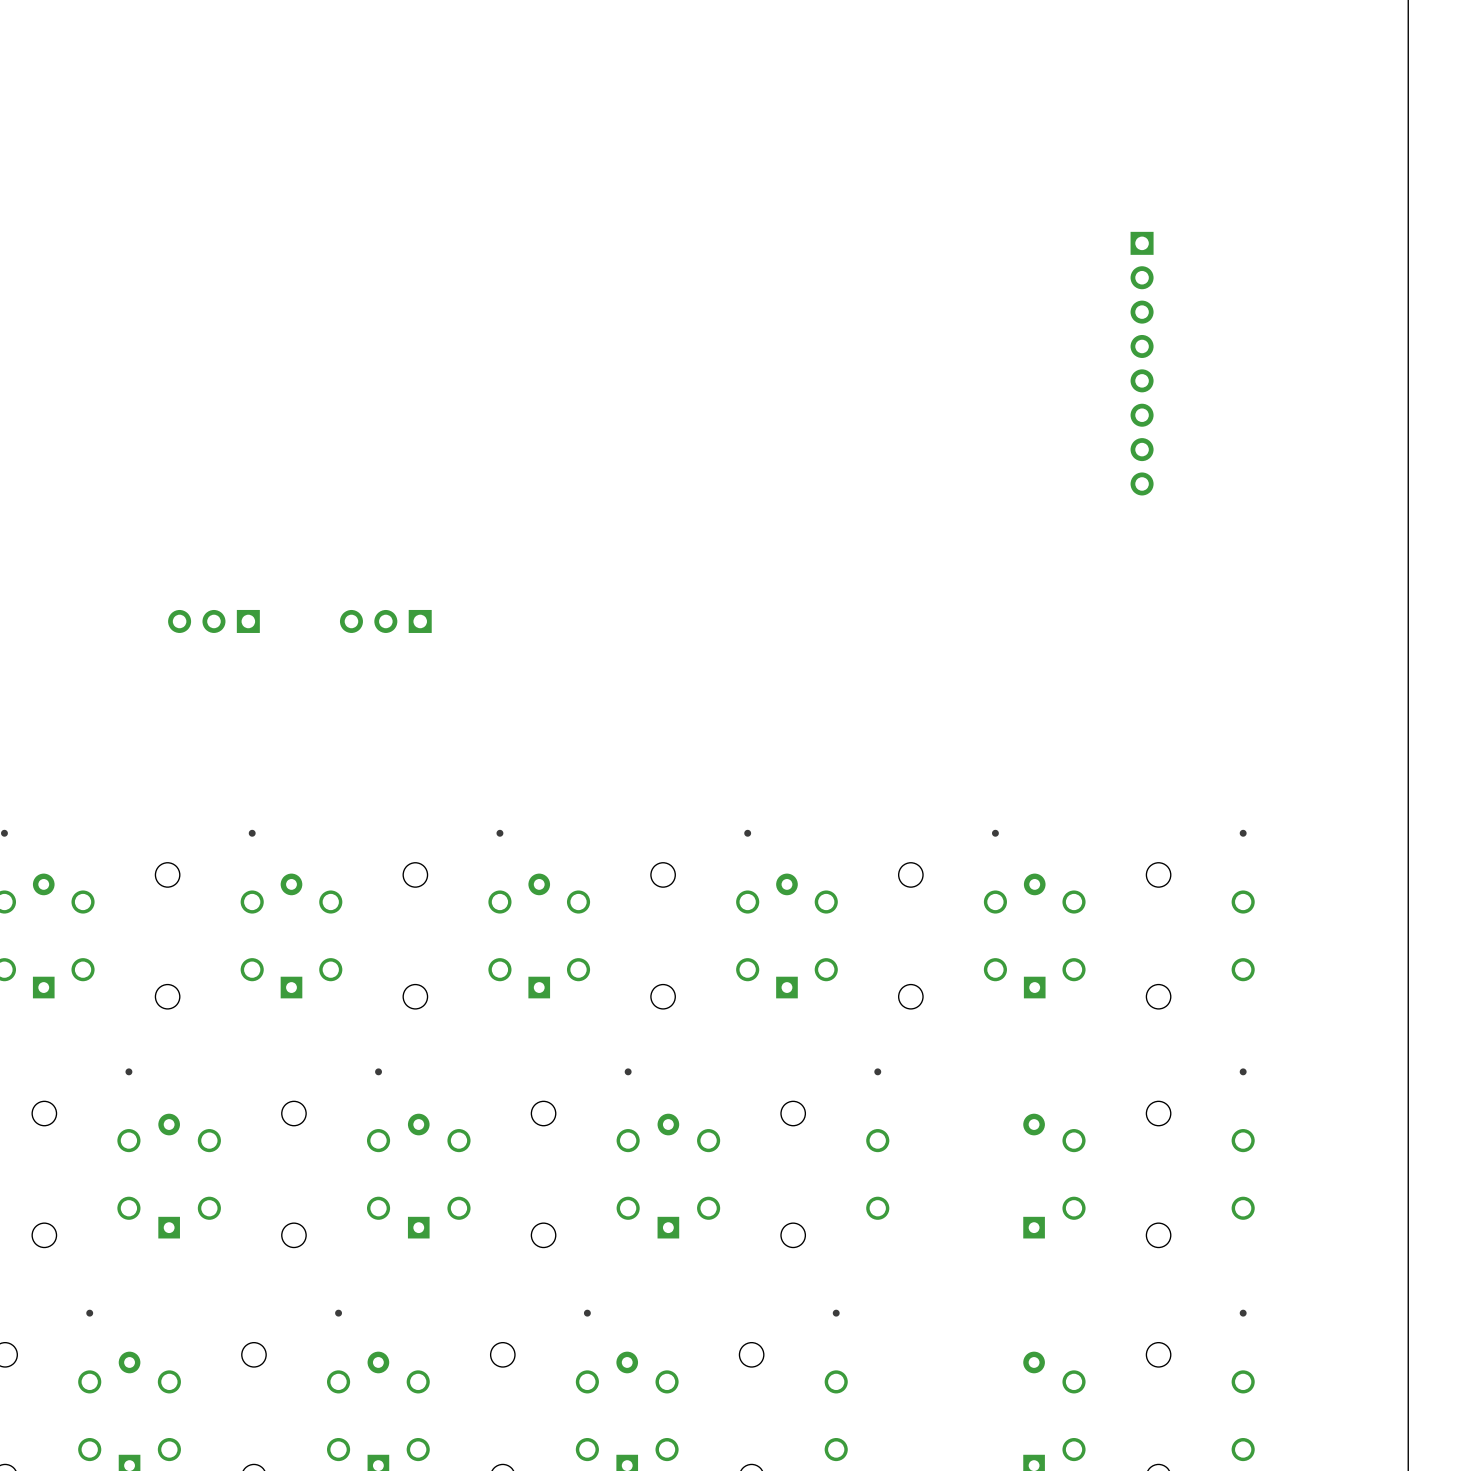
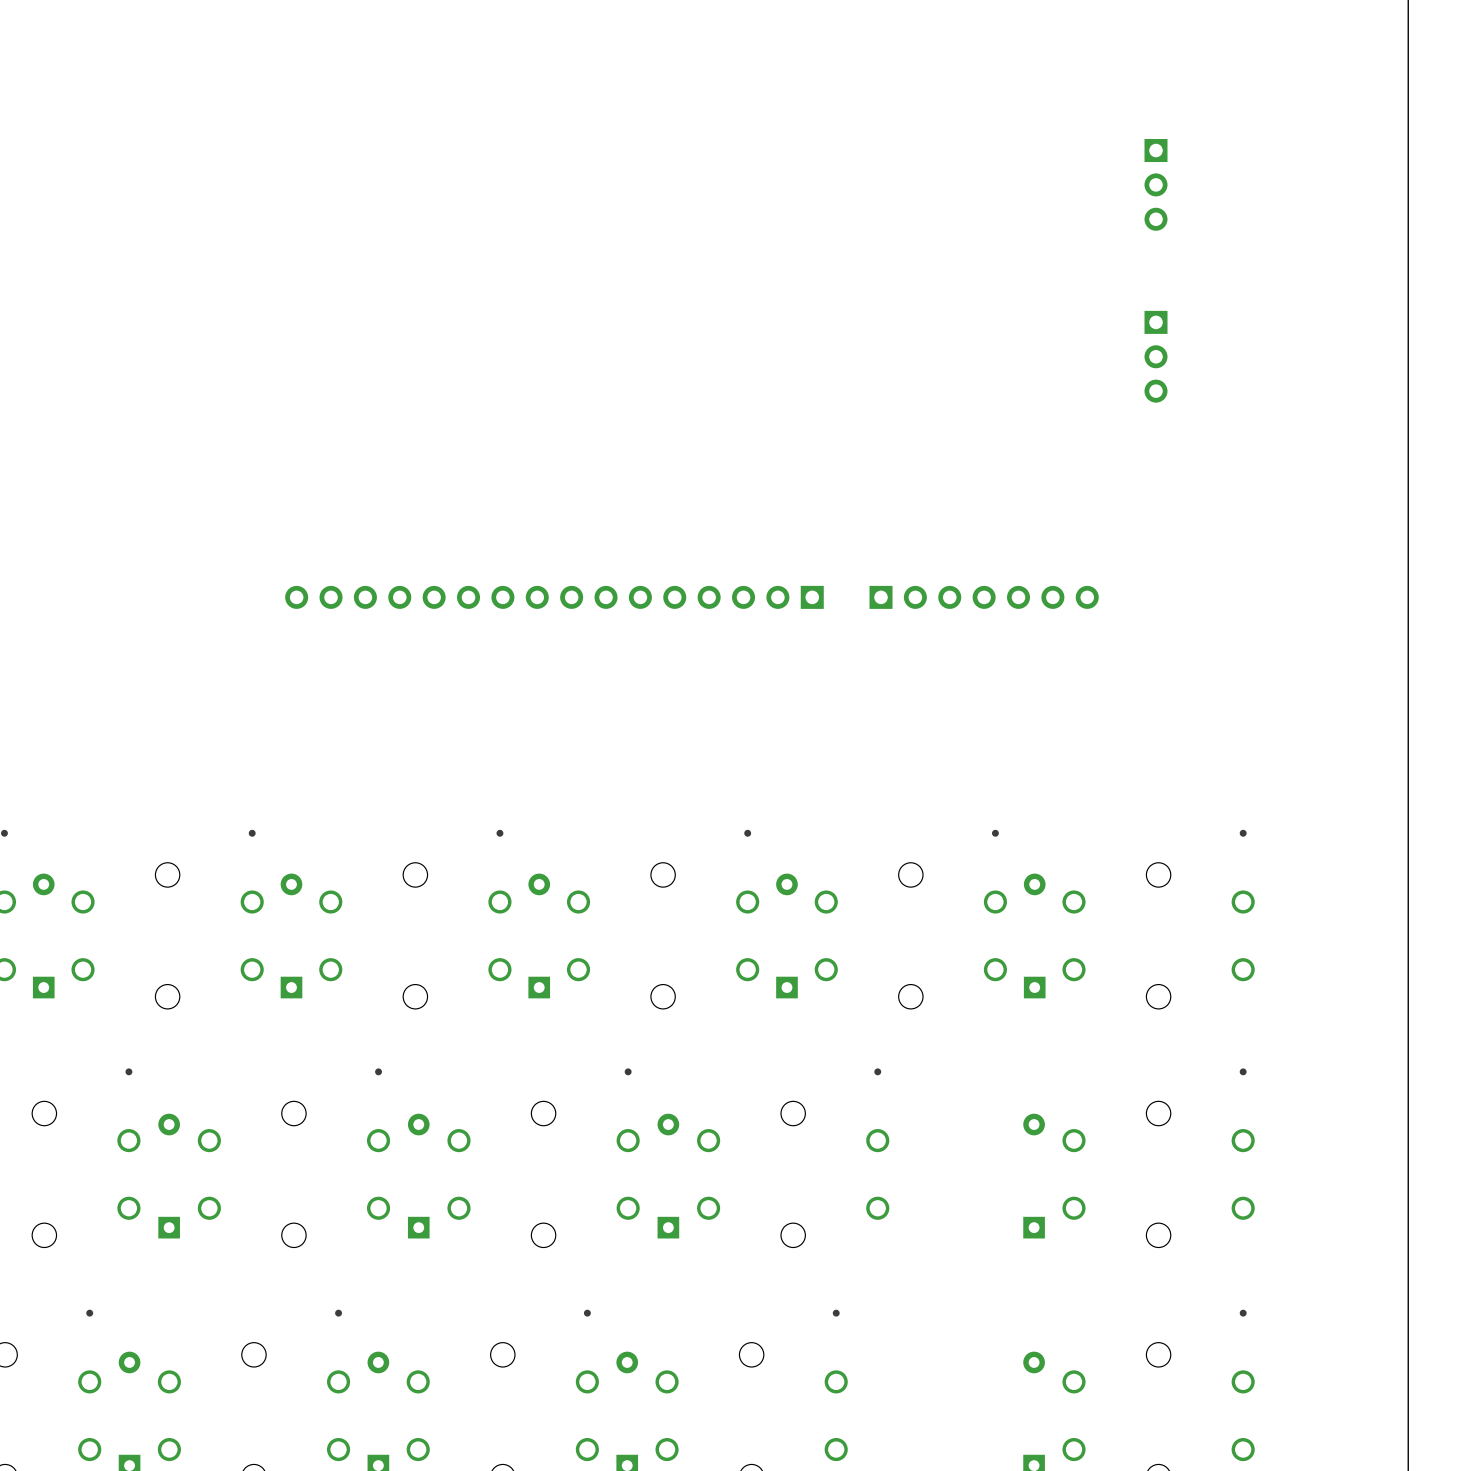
part: none -> (1156, 184)
part: none -> (1156, 356)
part: (1142, 363) -> none
part: none -> (554, 597)
part: none -> (984, 597)
part: (213, 621) -> none
part: (385, 621) -> none

